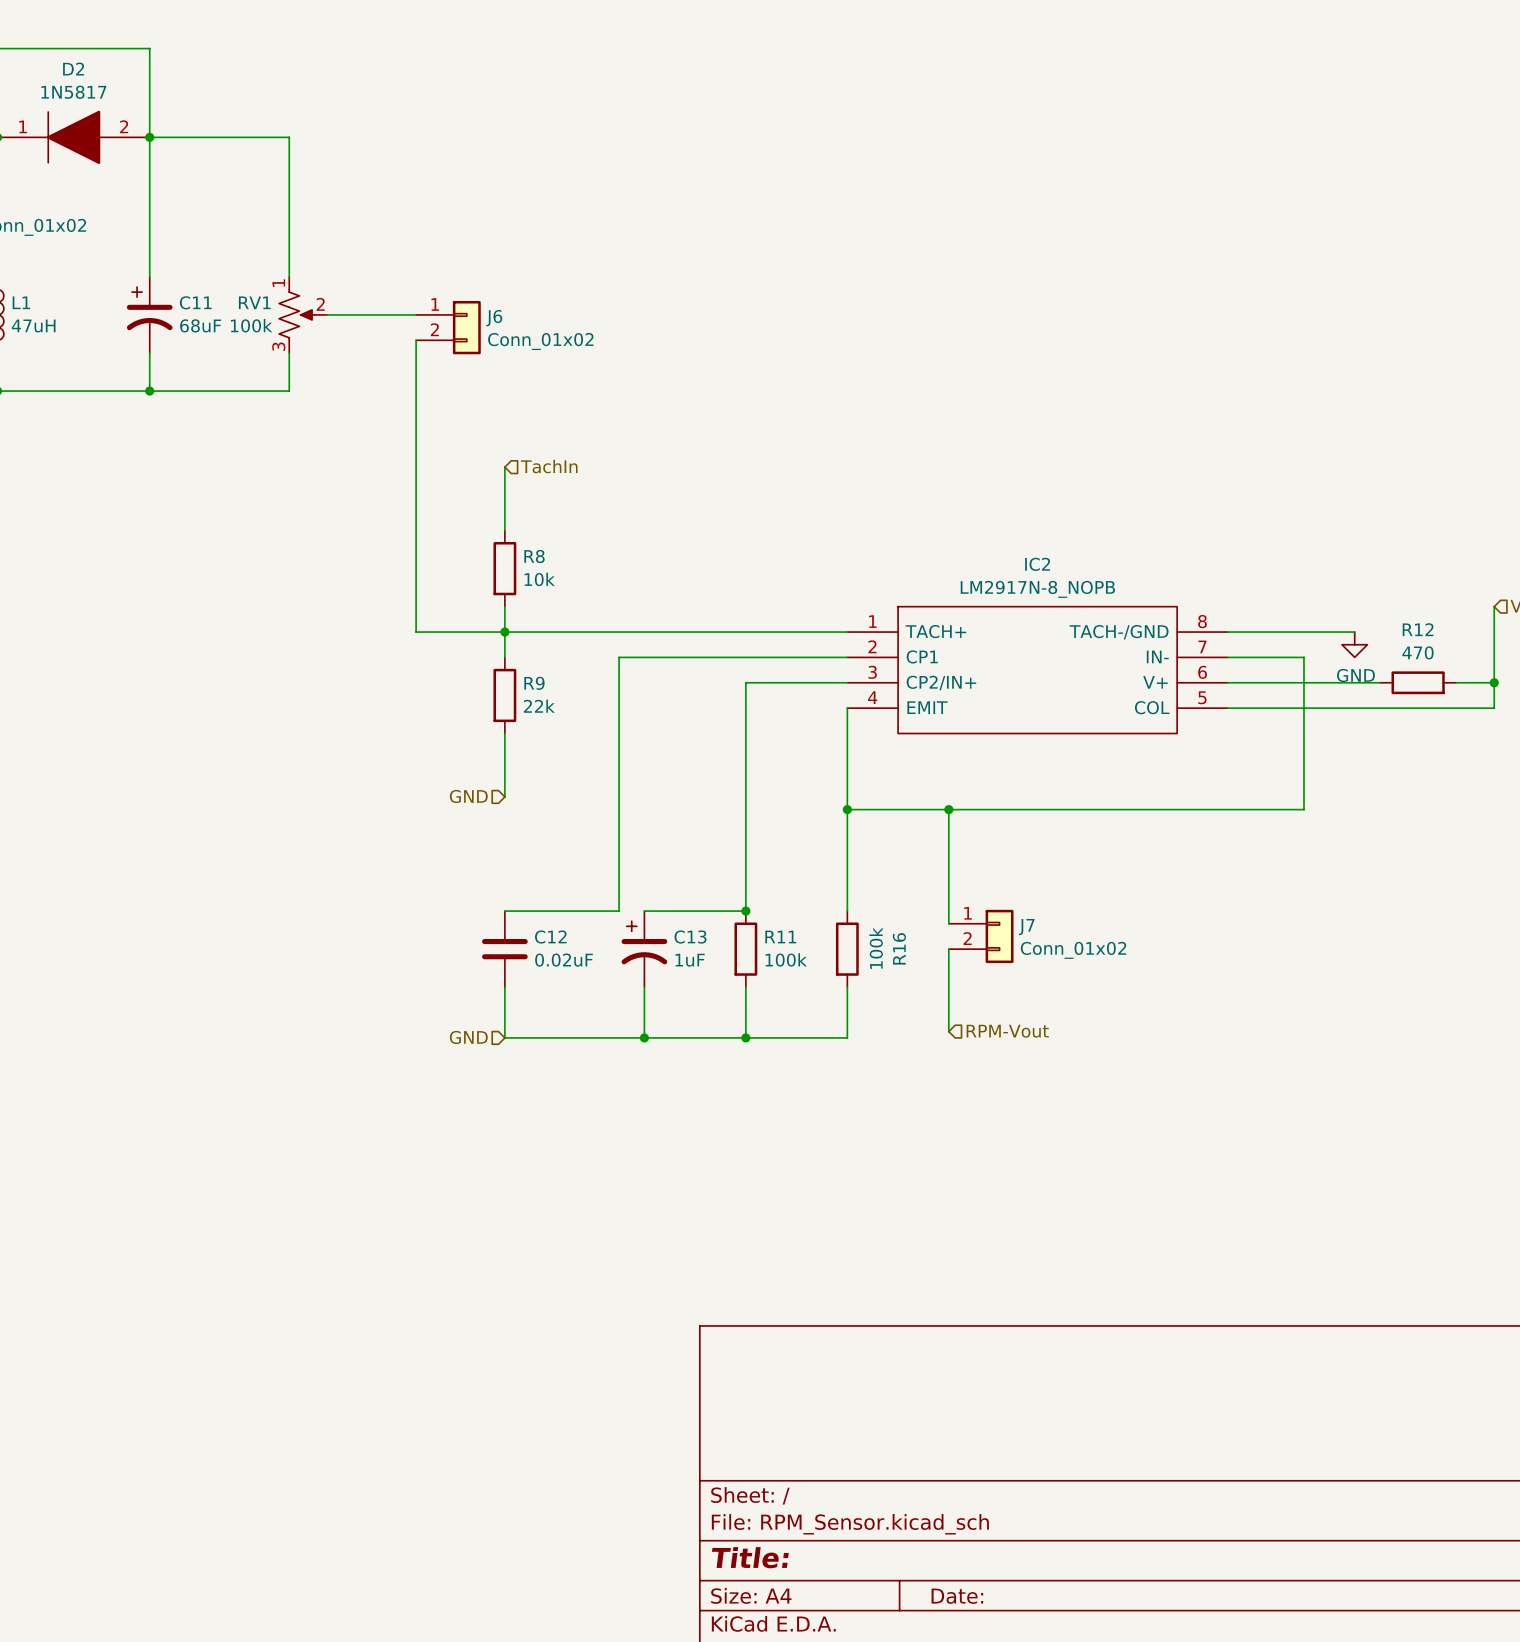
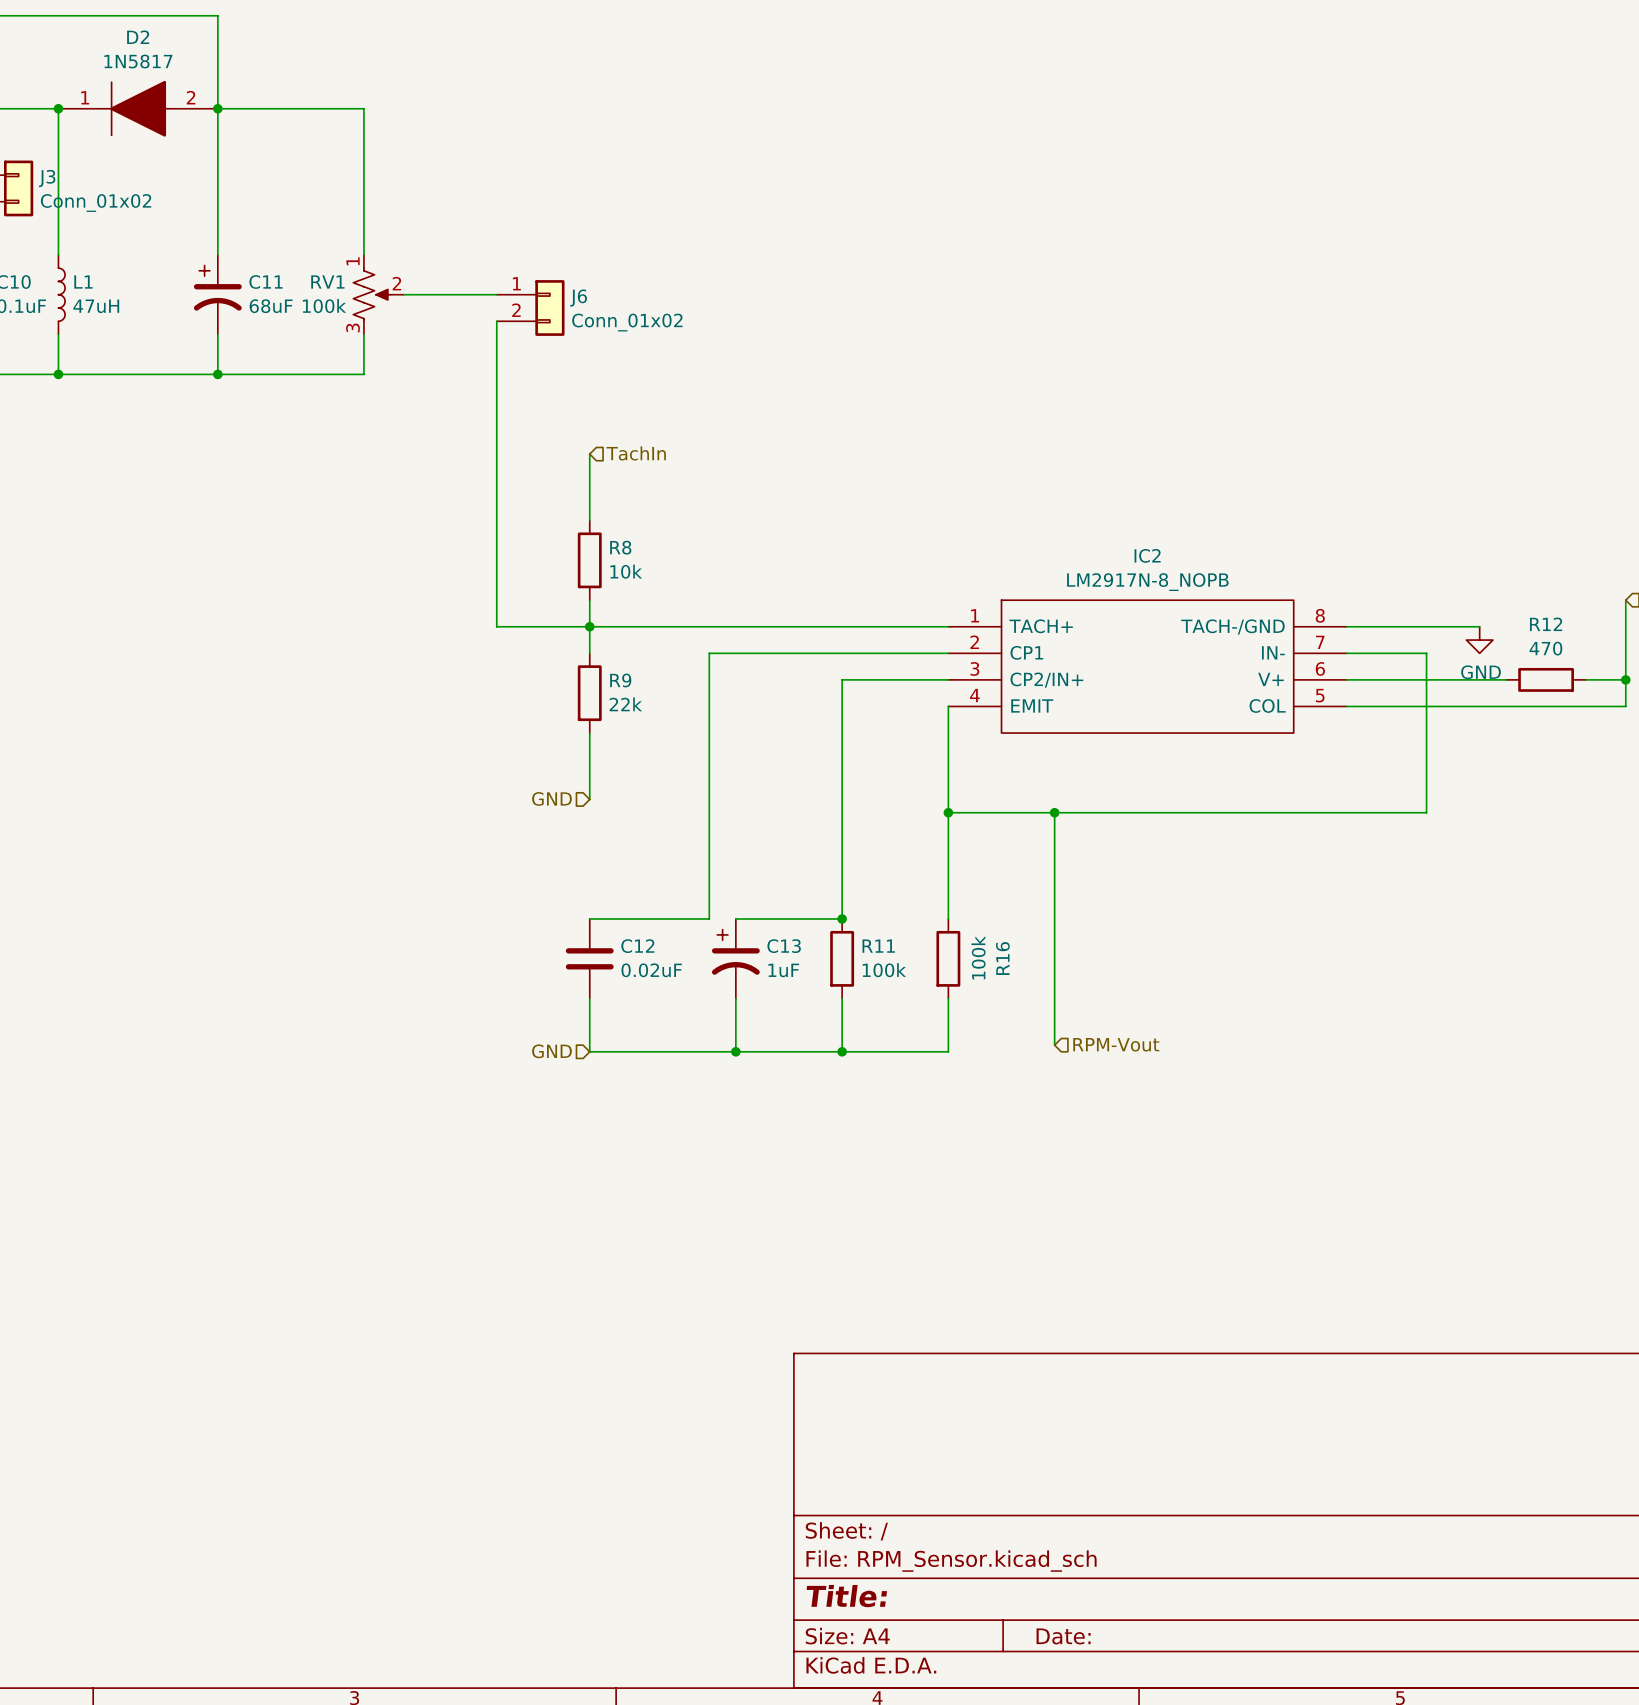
wire: none -> (1054, 932) (1054, 958)
J7: Conn_01x02 (981, 936) -> none

